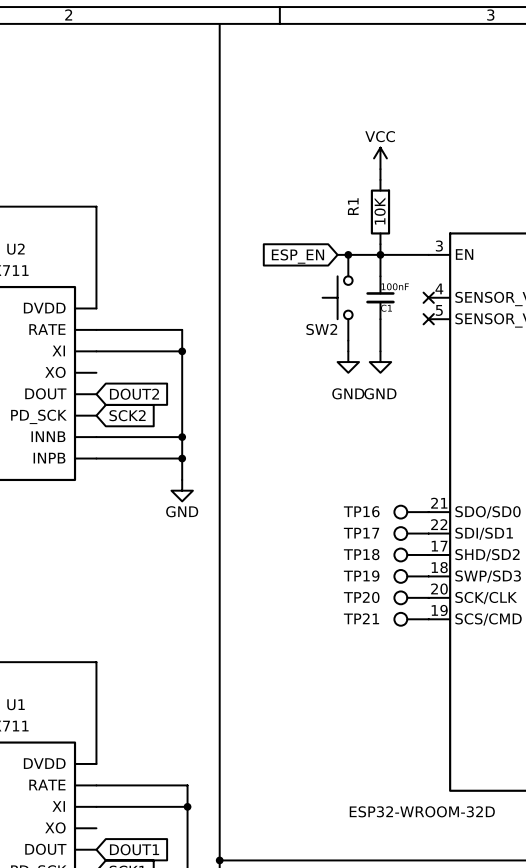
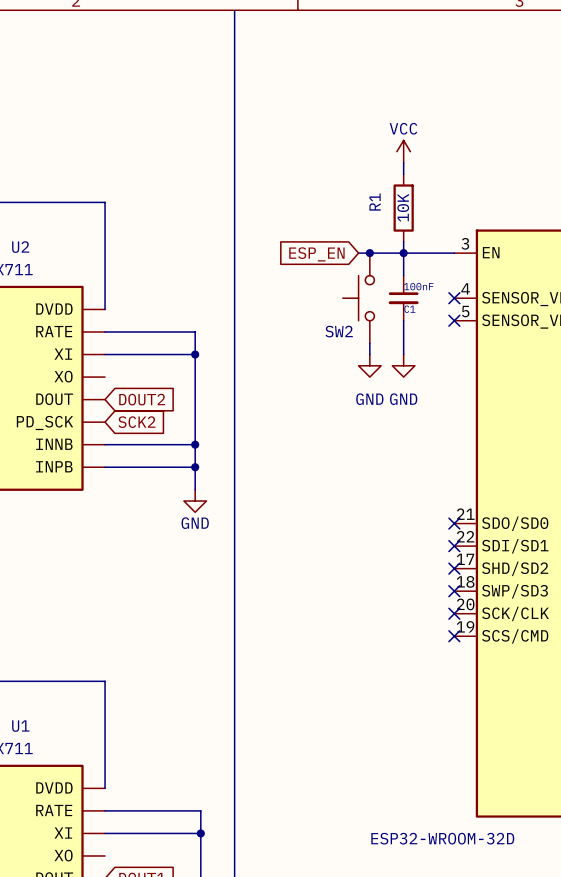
TP16: (411, 512) -> none
no-connect mark: none -> (454, 523)
TP17: (411, 533) -> none
no-connect mark: none -> (454, 546)
TP18: (411, 554) -> none
no-connect mark: none -> (454, 568)
TP19: (411, 576) -> none
no-connect mark: none -> (454, 591)
TP20: (411, 597) -> none
no-connect mark: none -> (454, 613)
TP21: (411, 619) -> none
no-connect mark: none -> (454, 636)

